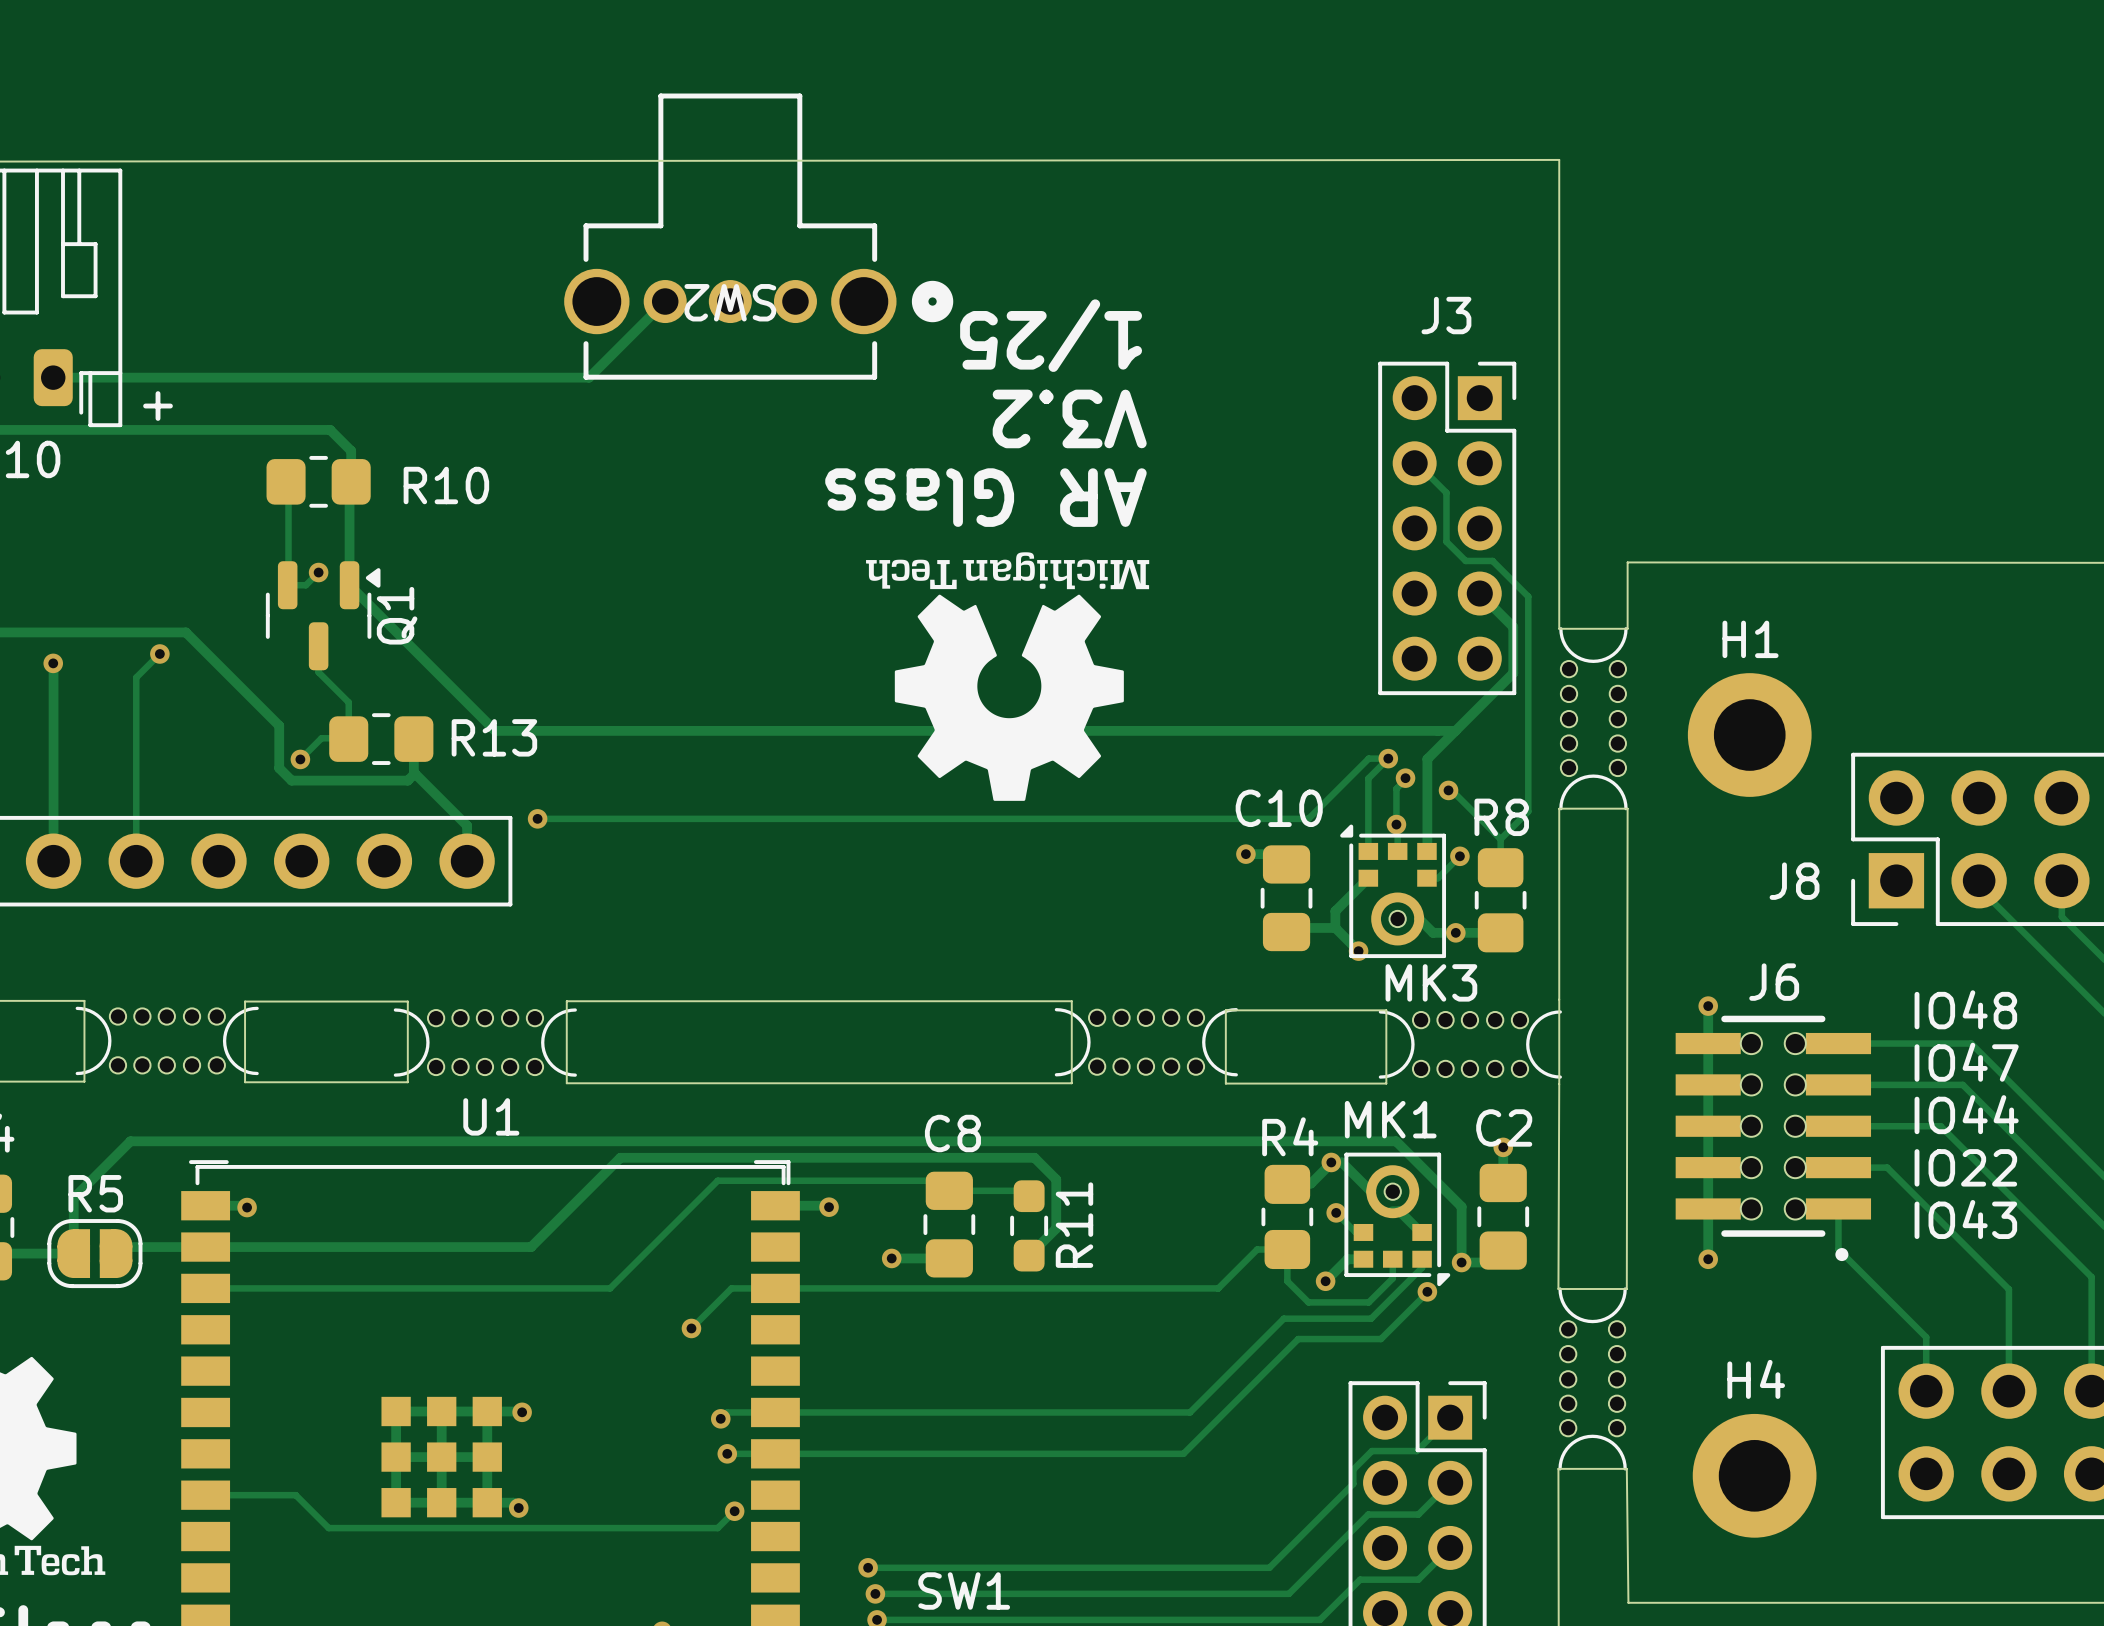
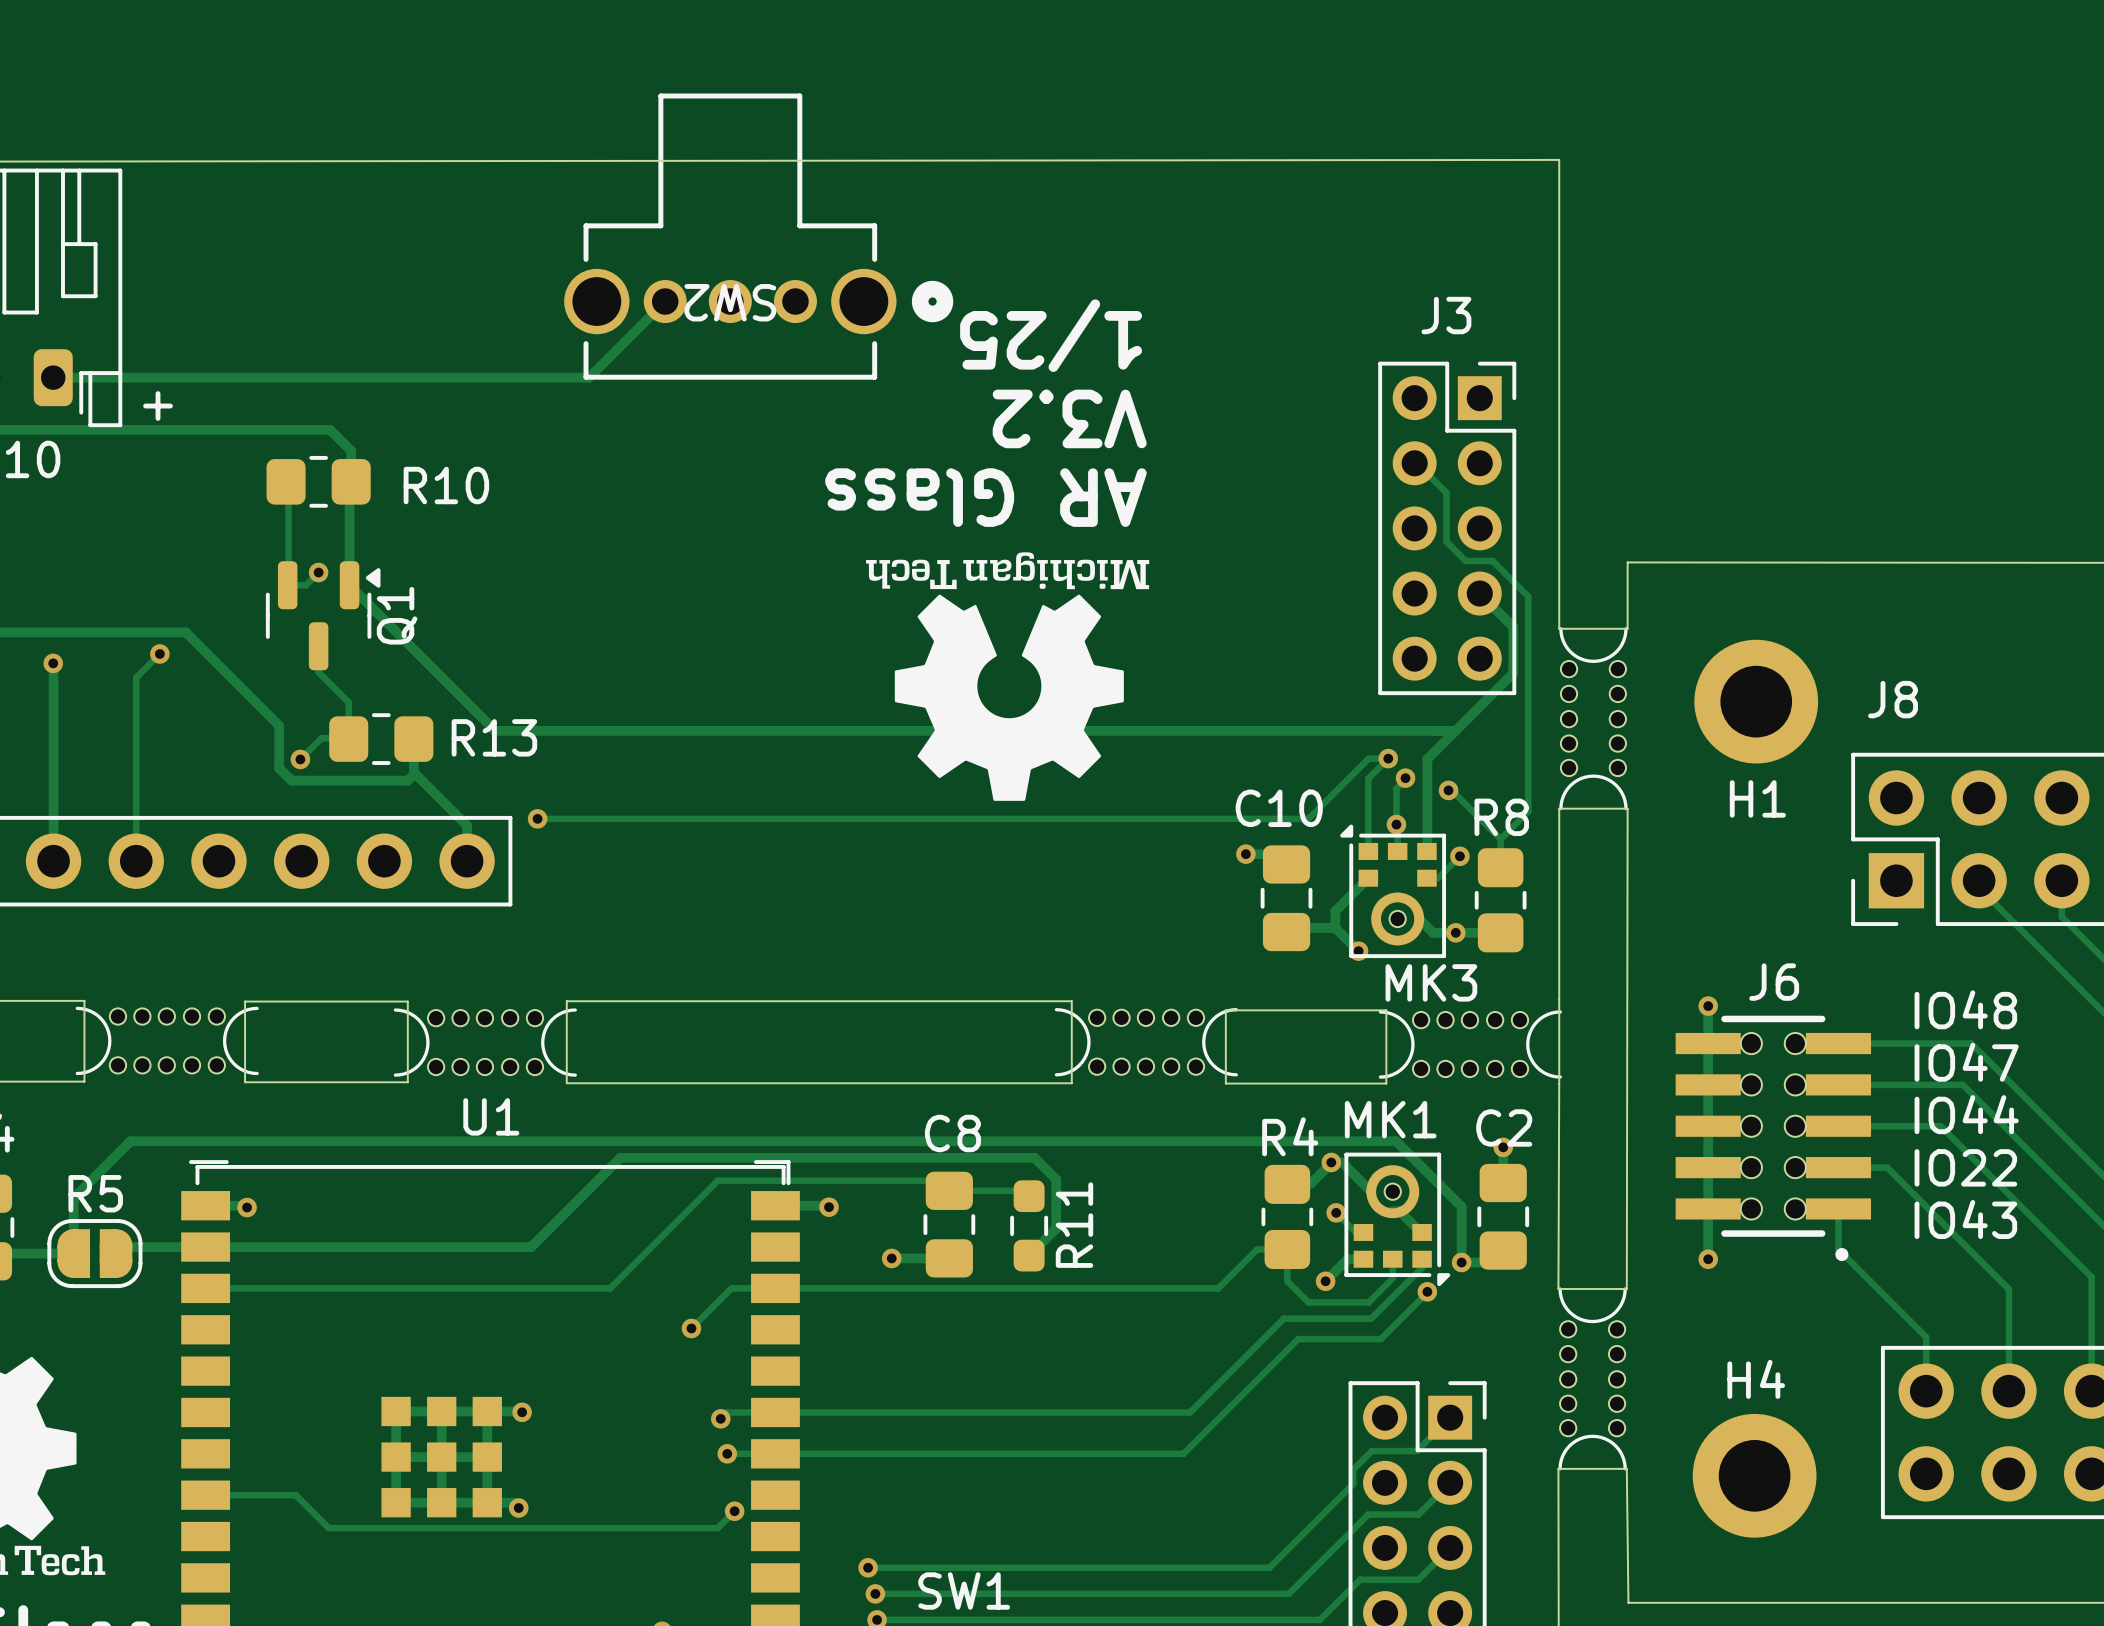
H1 name position: H1 (1750, 639) -> H1 (1757, 798)
H1 position: (1749, 735) -> (1756, 701)
J8 name position: J8 (1794, 881) -> J8 (1893, 699)

